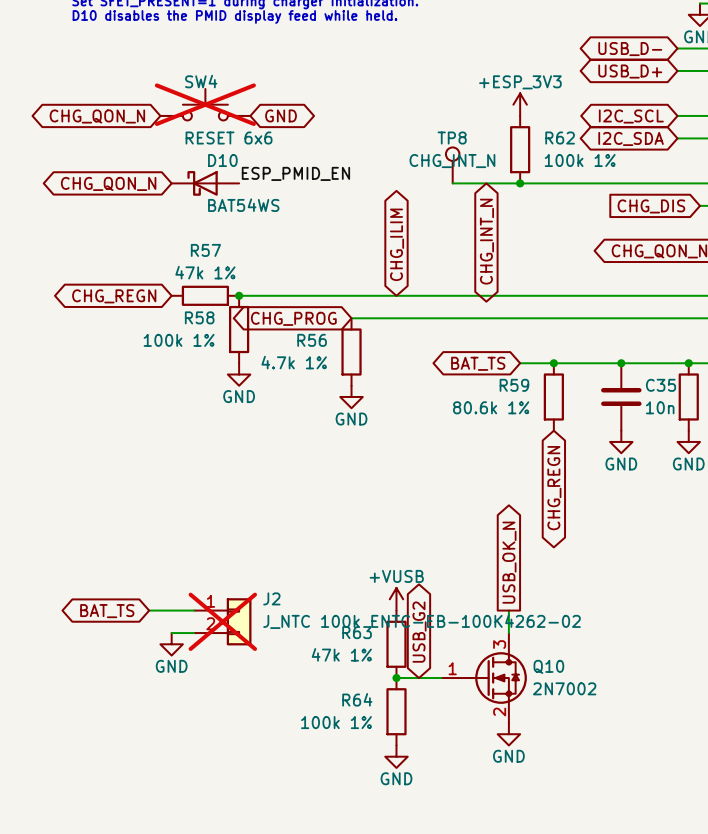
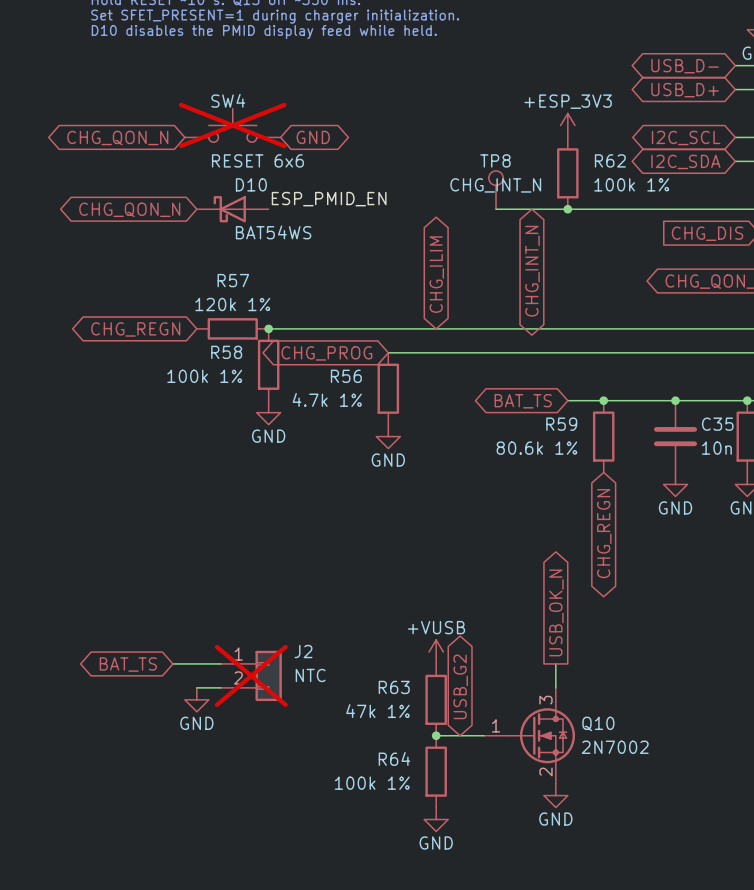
R57 value: 47k 1% (205, 272) -> 120k 1% (232, 304)
J2 value: J_NTC 100k ENTC-EB-100K4262-02 (422, 621) -> NTC (310, 675)

